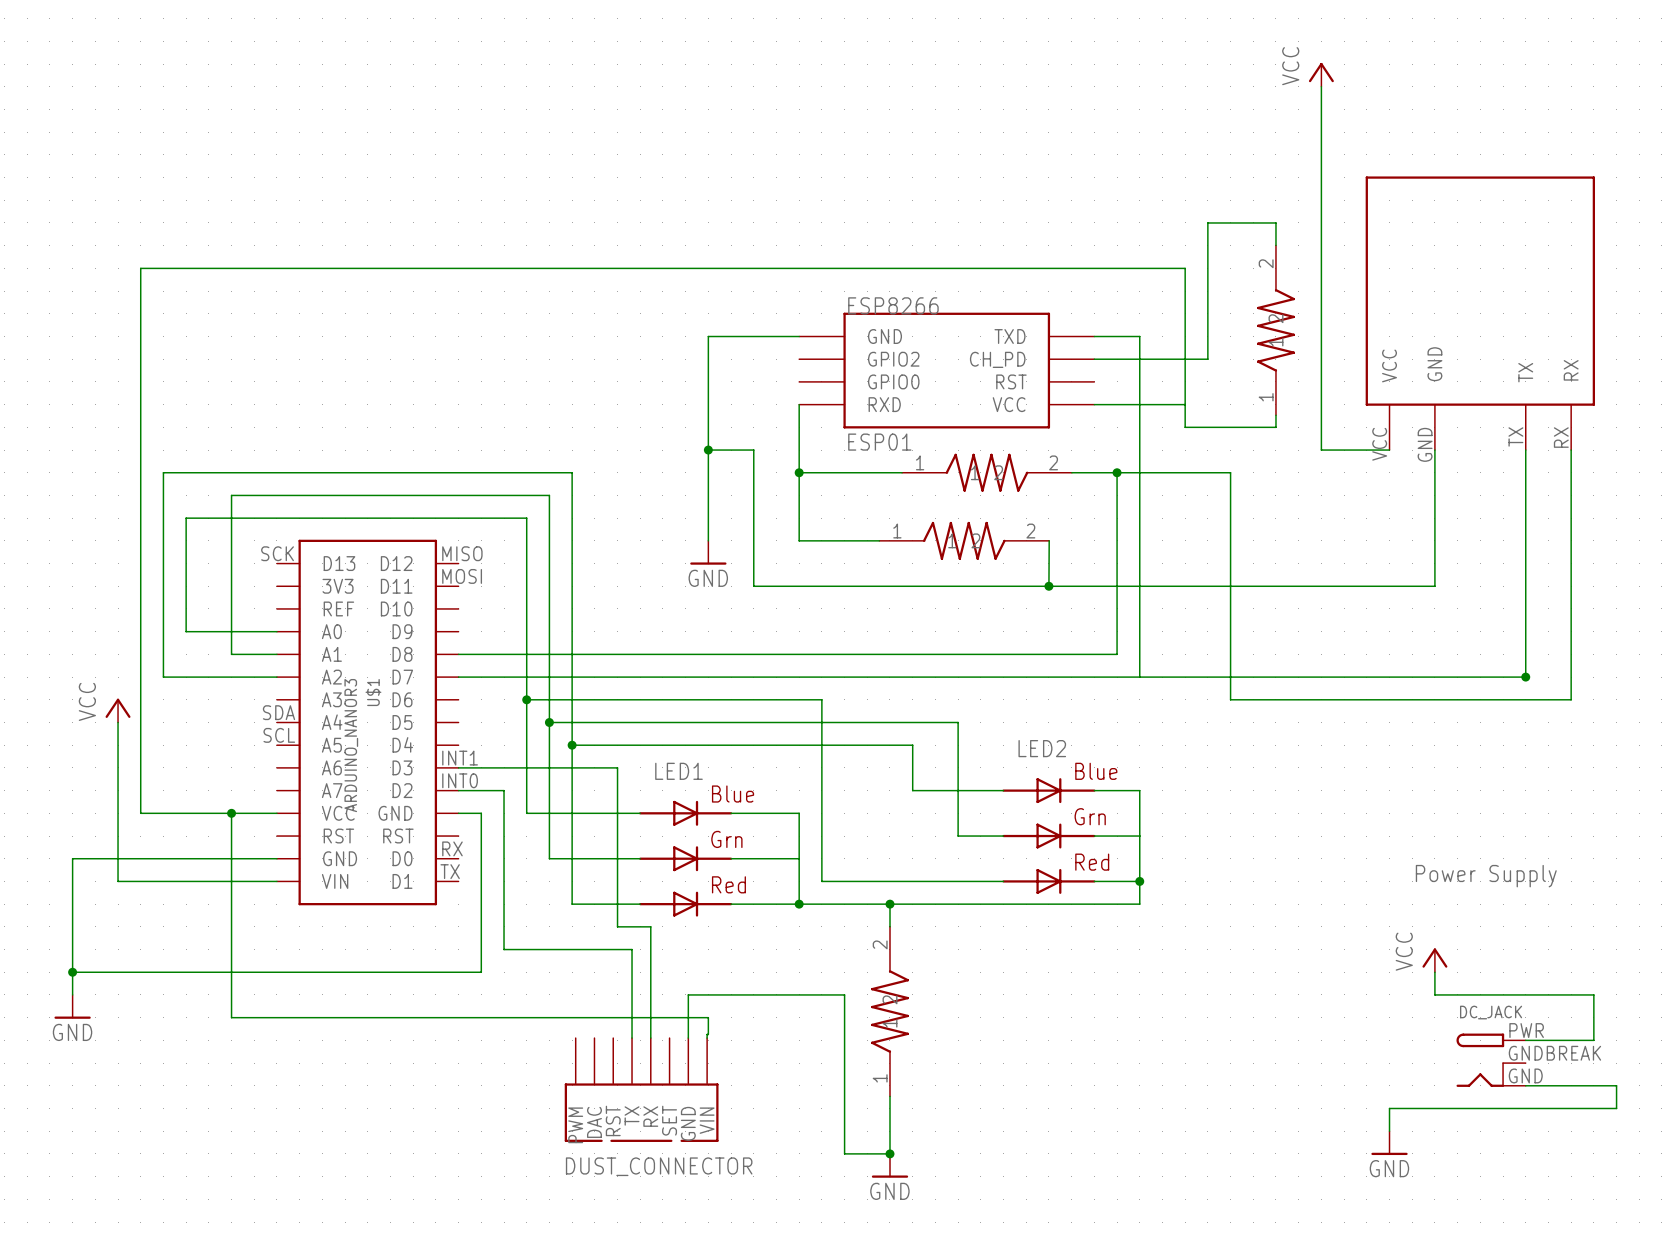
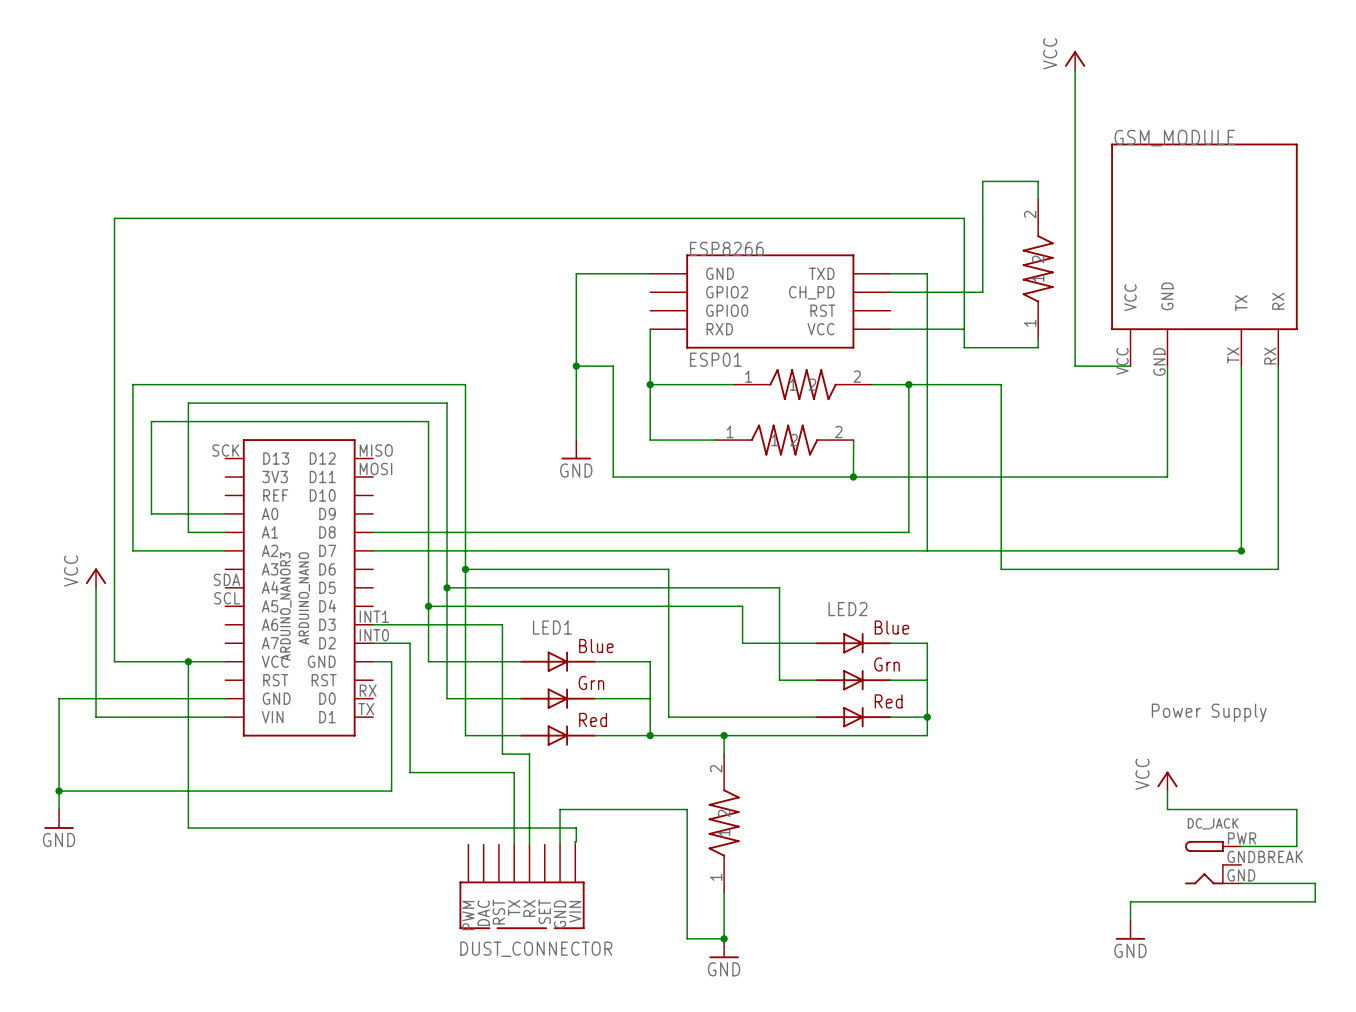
GSM_MODULE name: none -> GSM_MODULE (1174, 138)
U$1 name: U$1 (373, 692) -> ARDUINO_NANO (304, 598)
wire: (526, 699) (572, 699) -> (428, 606) (465, 606)
junction: (526, 699) -> none
junction: none -> (465, 569)
junction: none -> (428, 606)
junction: (572, 745) -> none

